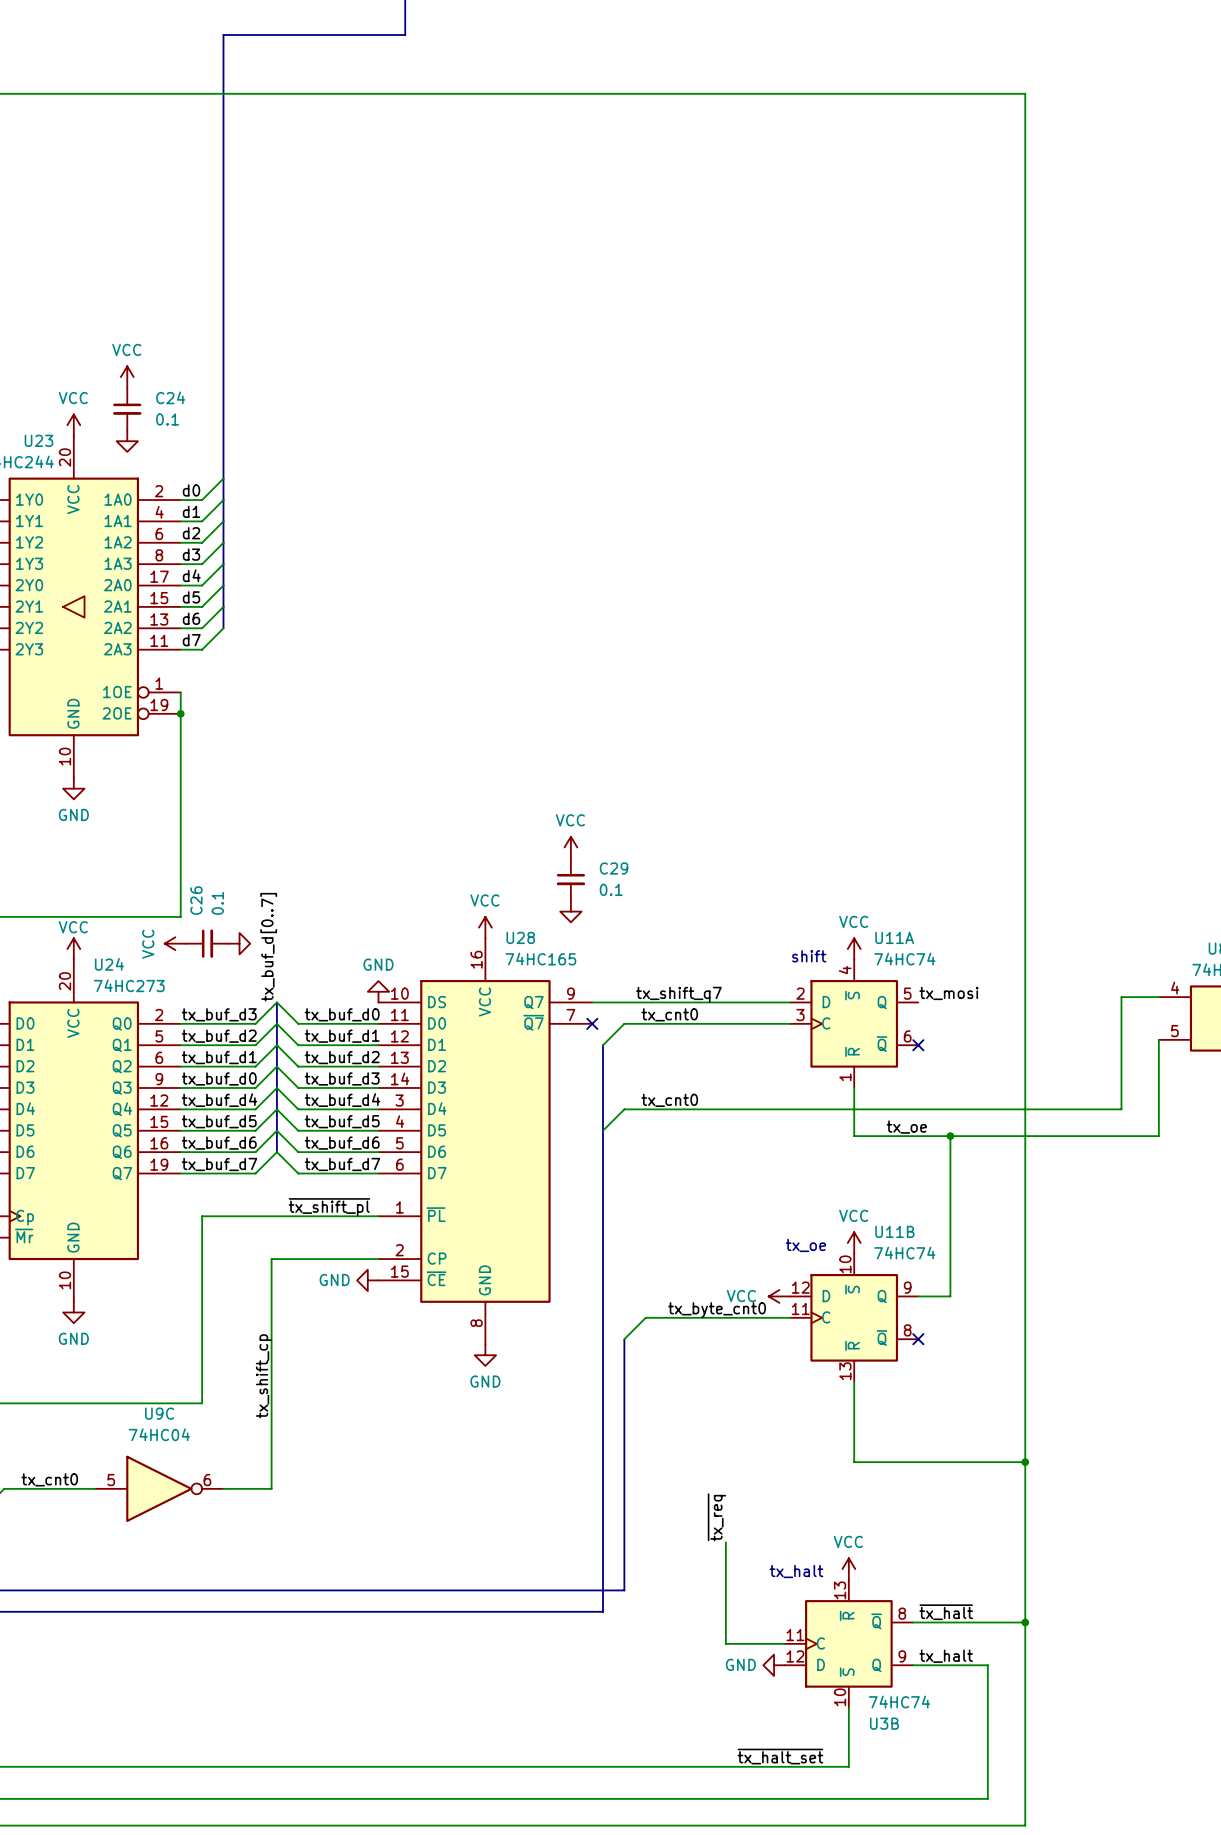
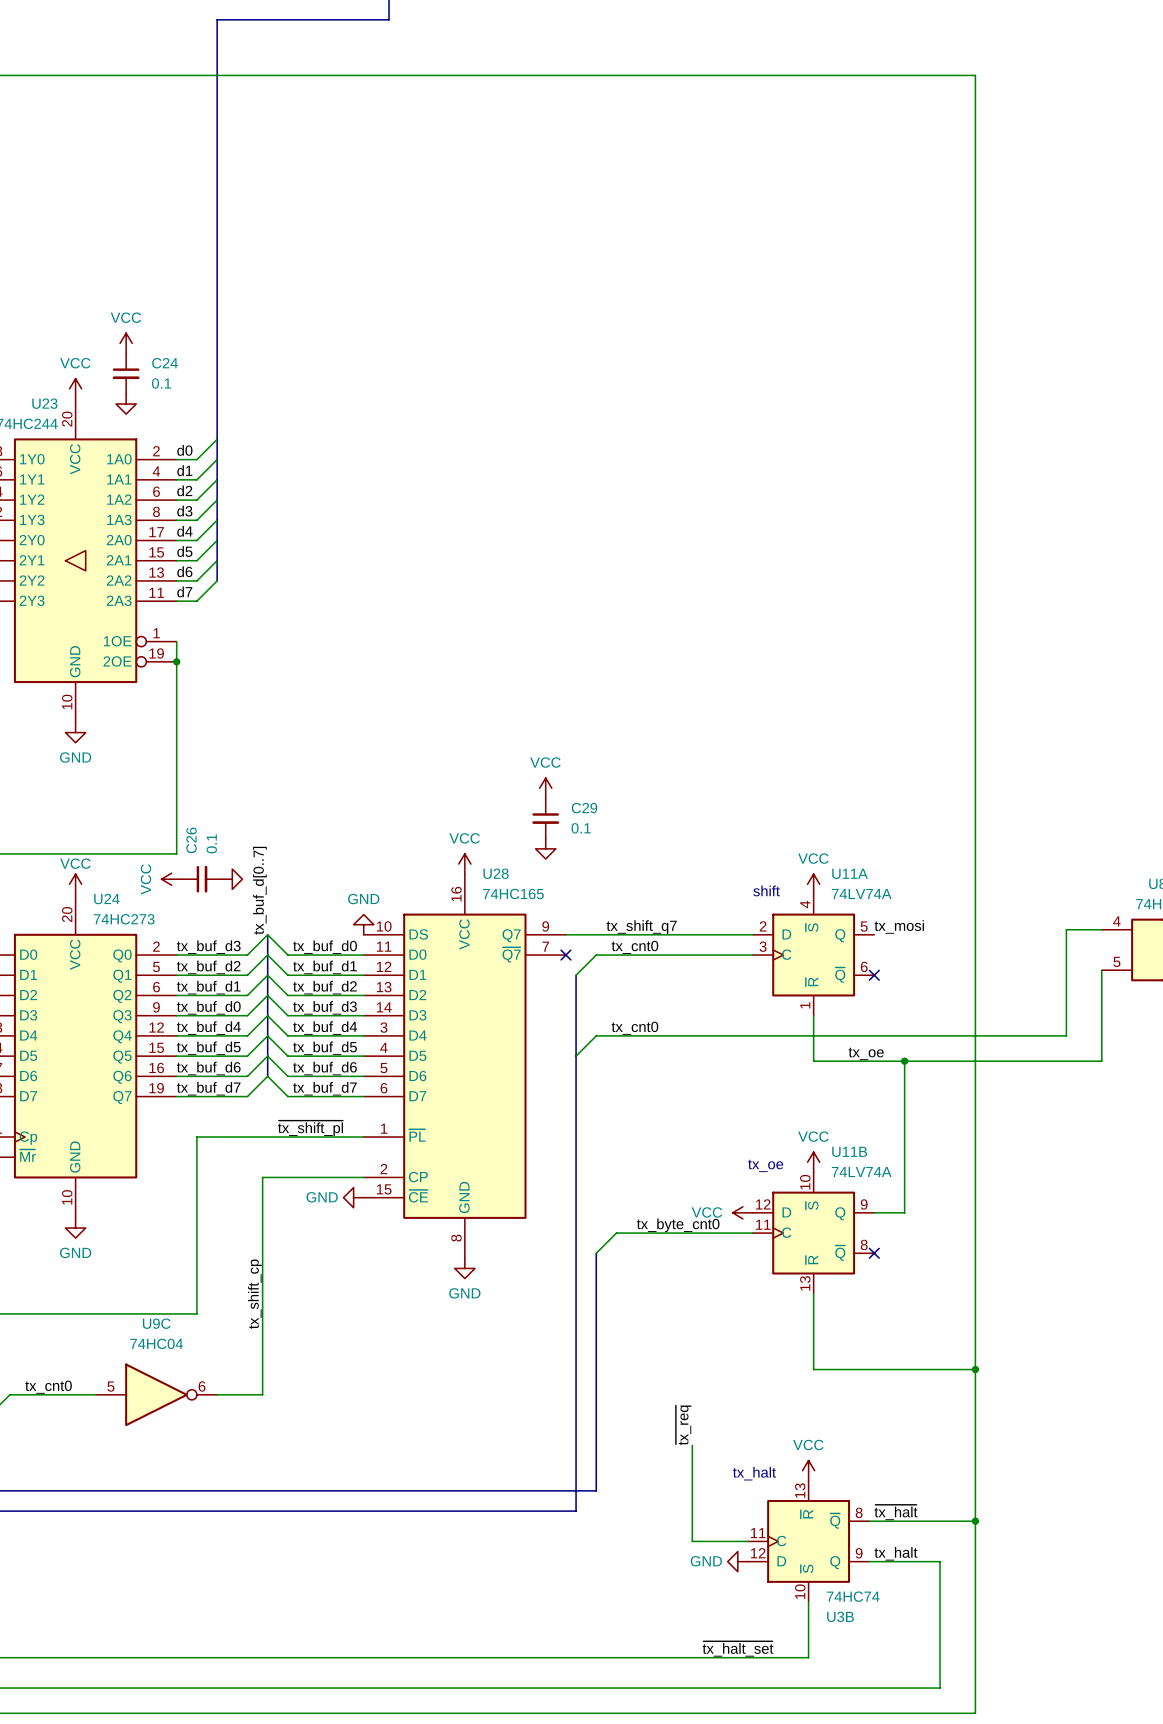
U11A value: 74HC74 (904, 959) -> 74LV74A (861, 893)
U11B value: 74HC74 (904, 1253) -> 74LV74A (861, 1172)

